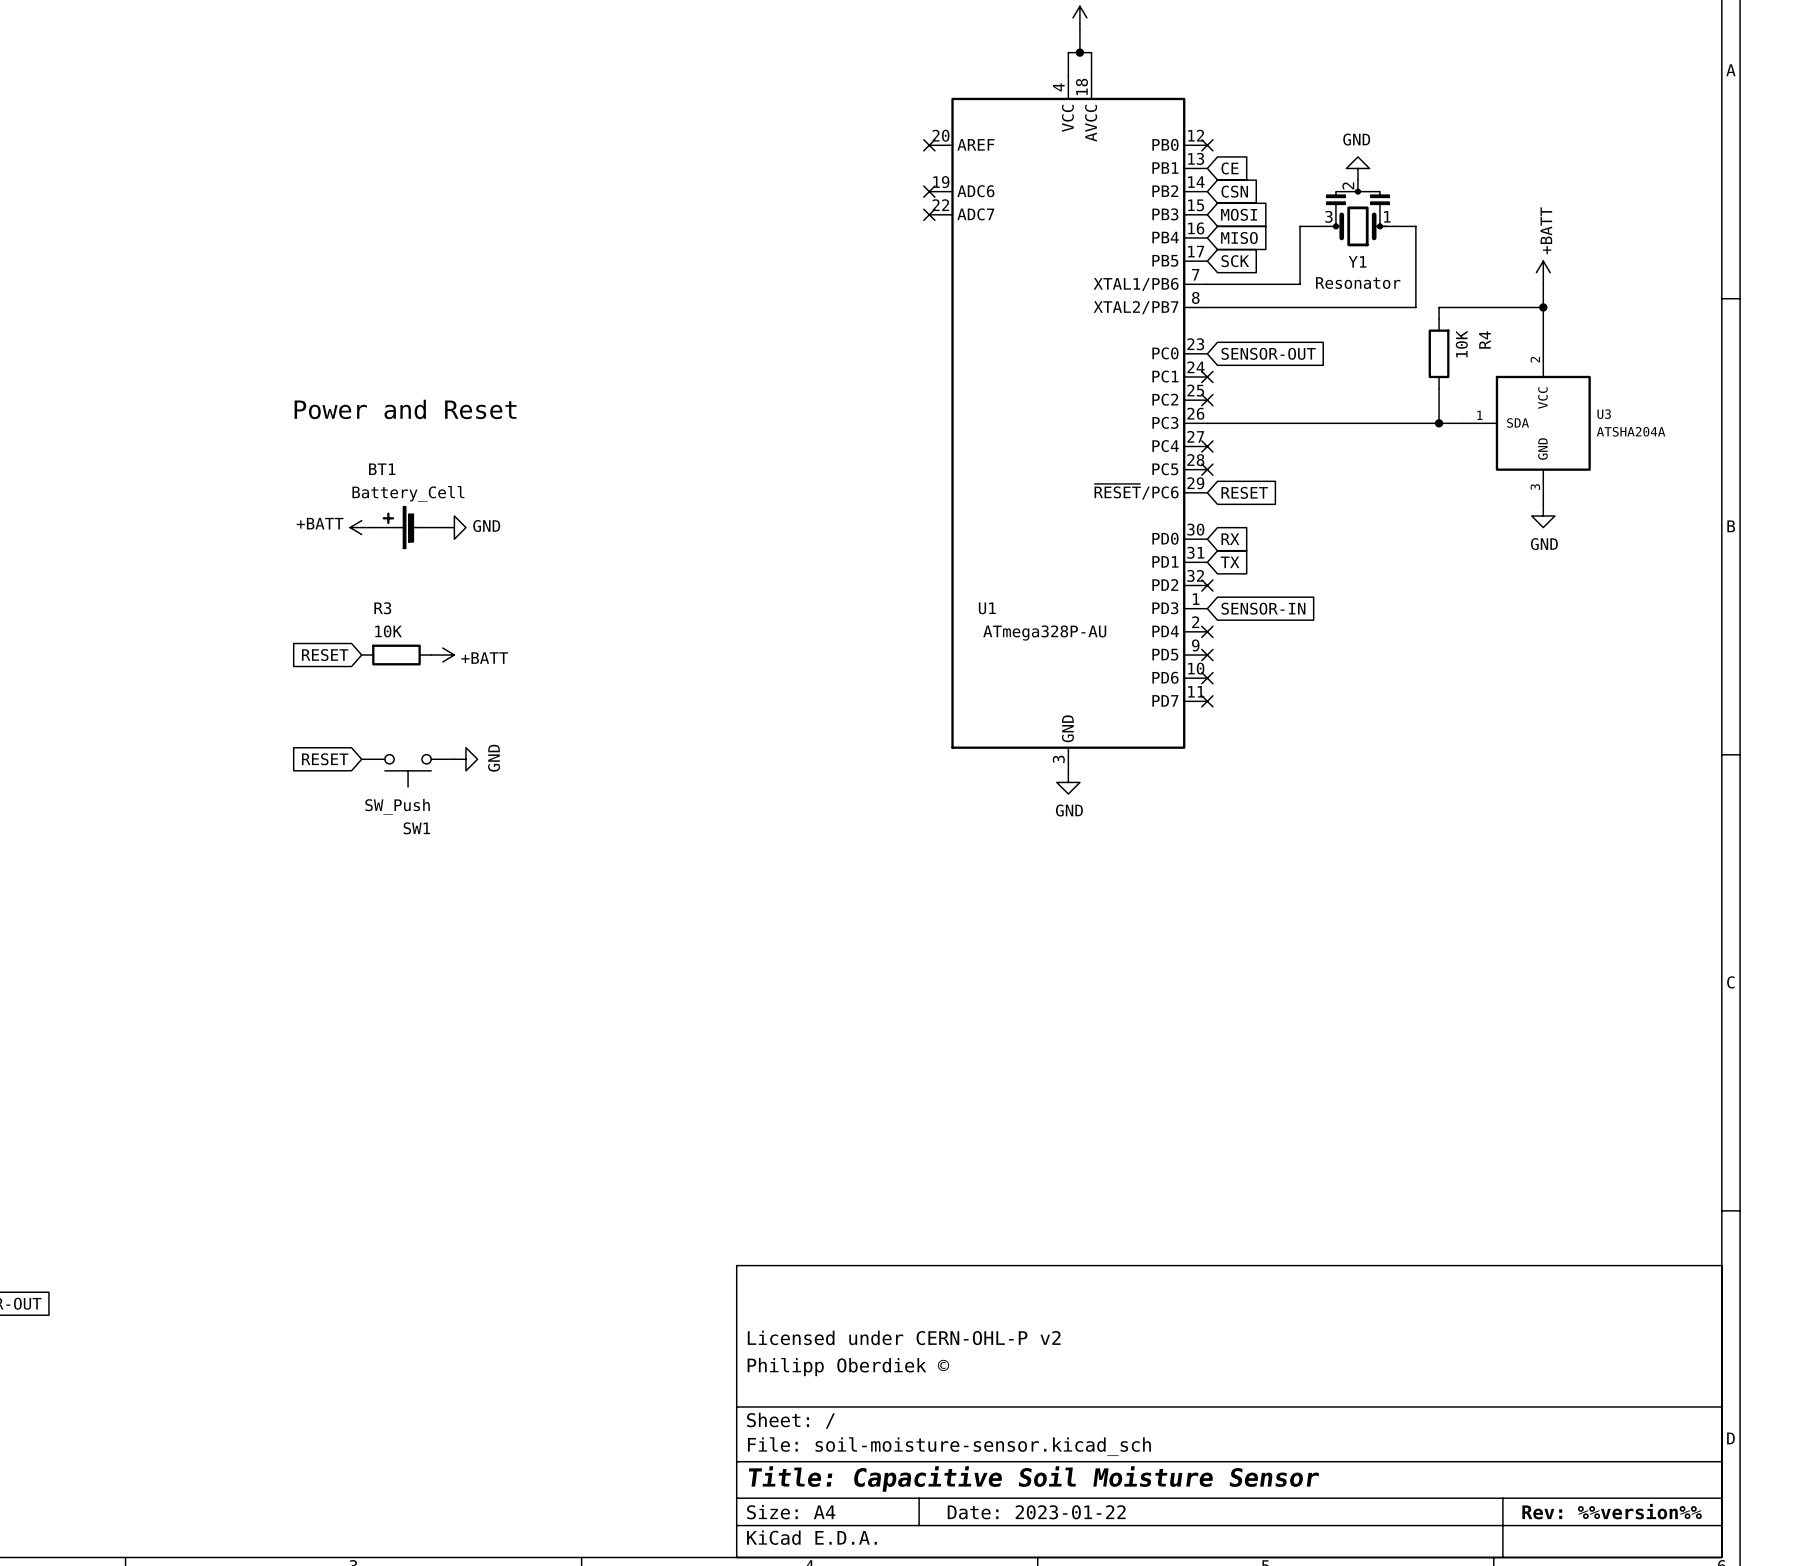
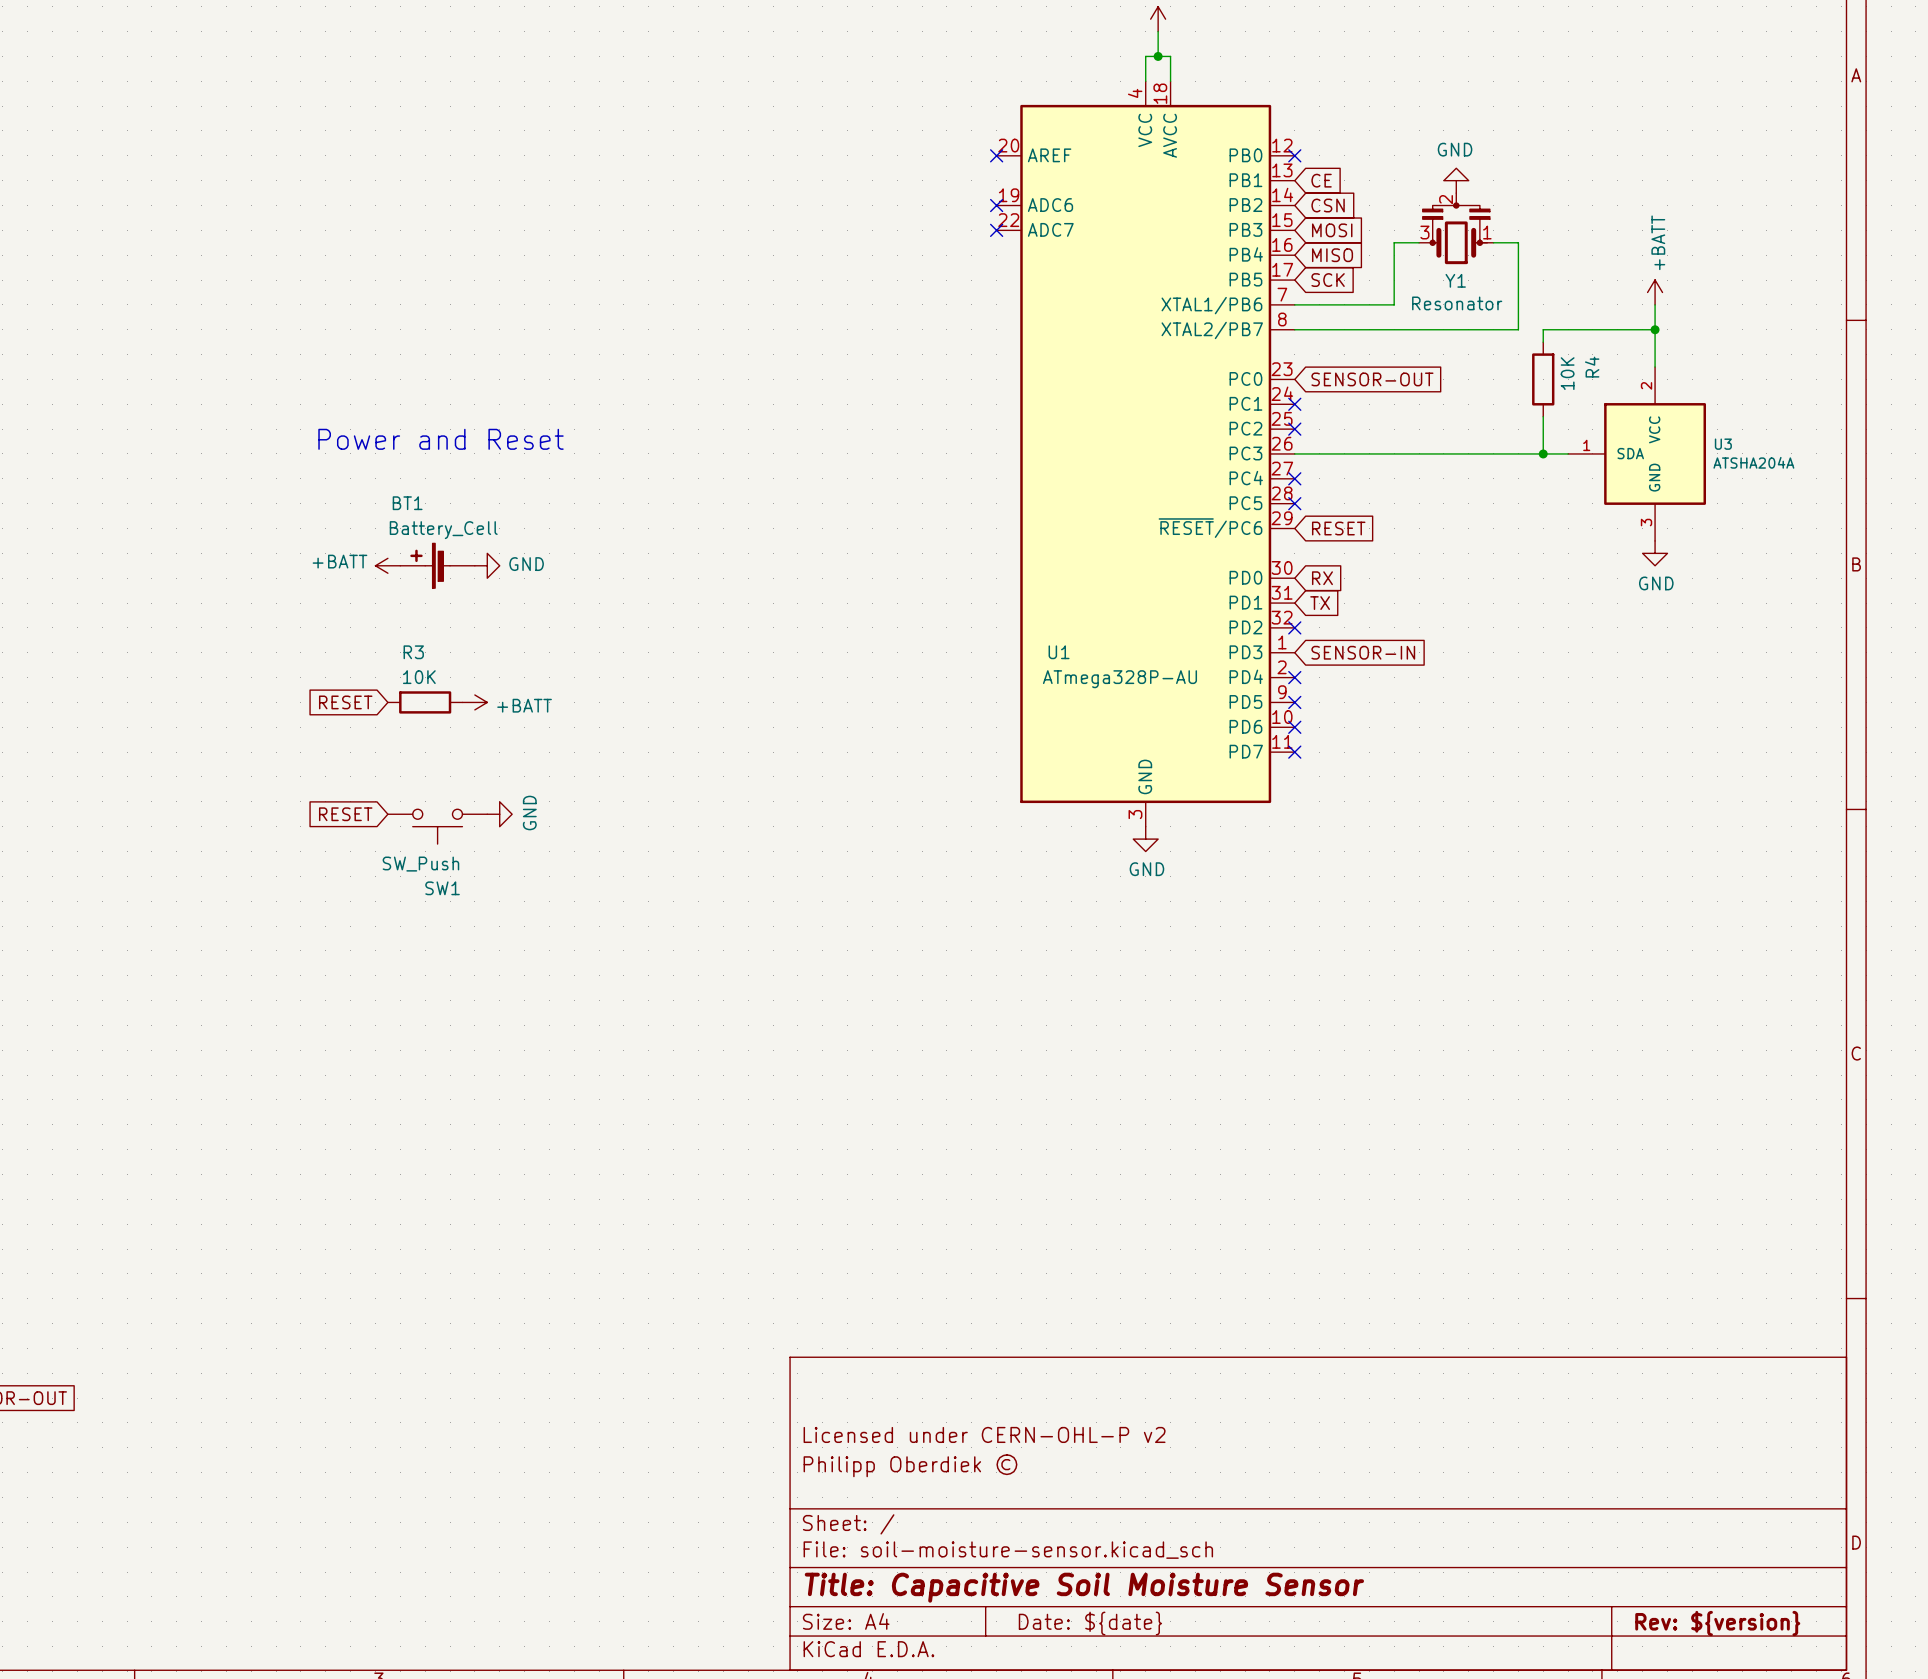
title block: Rev: %%version%% (1612, 1511) -> Rev: ${version} (1717, 1623)
title block: Date: 2023-01-22 (1036, 1512) -> Date: ${date} (1090, 1623)

